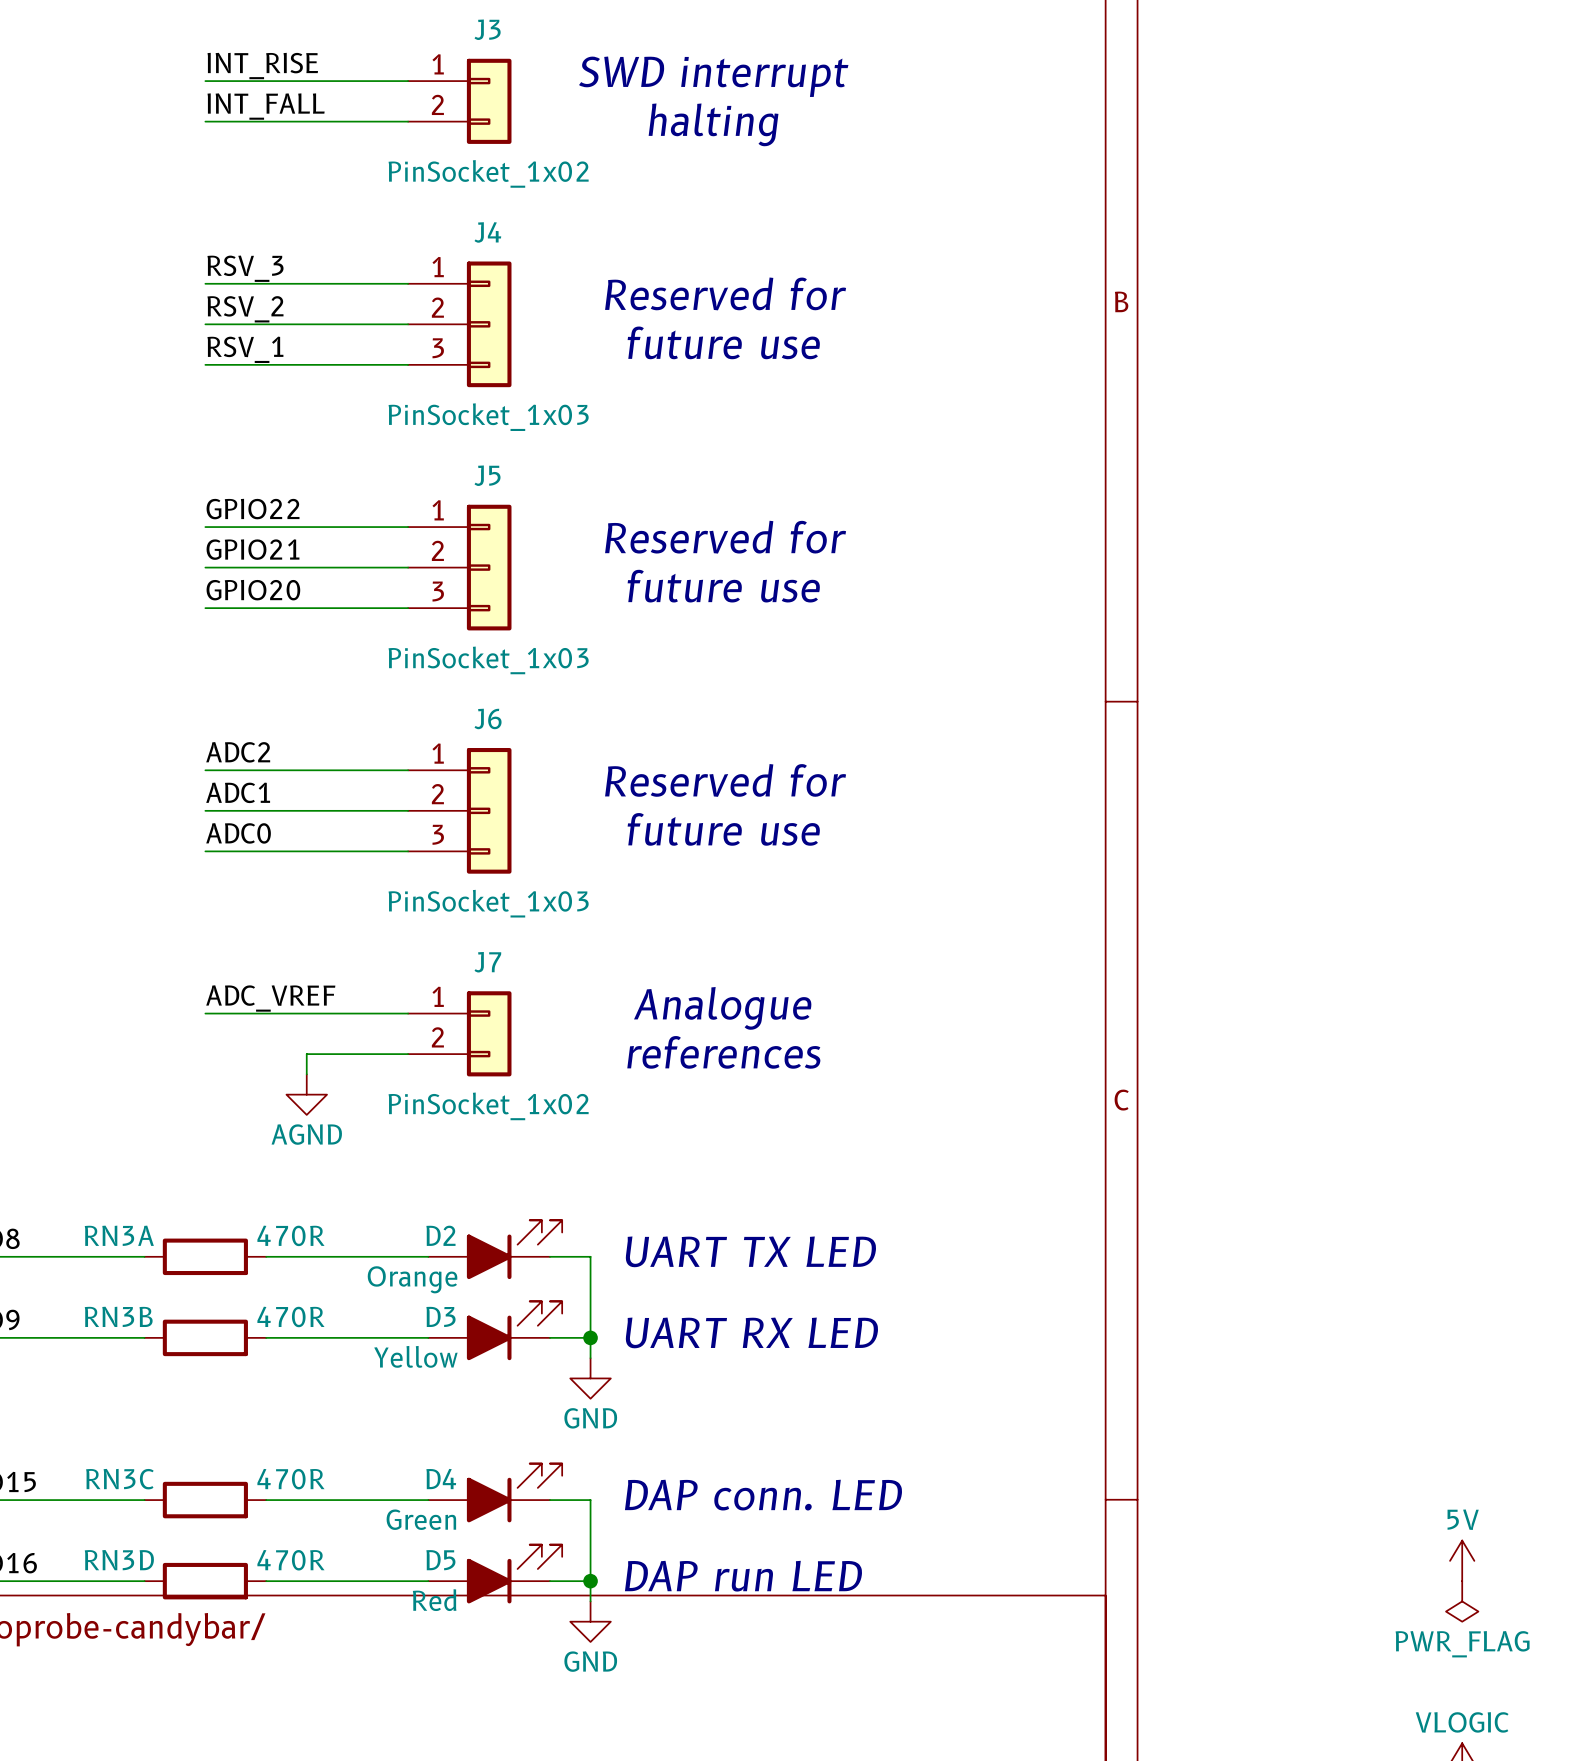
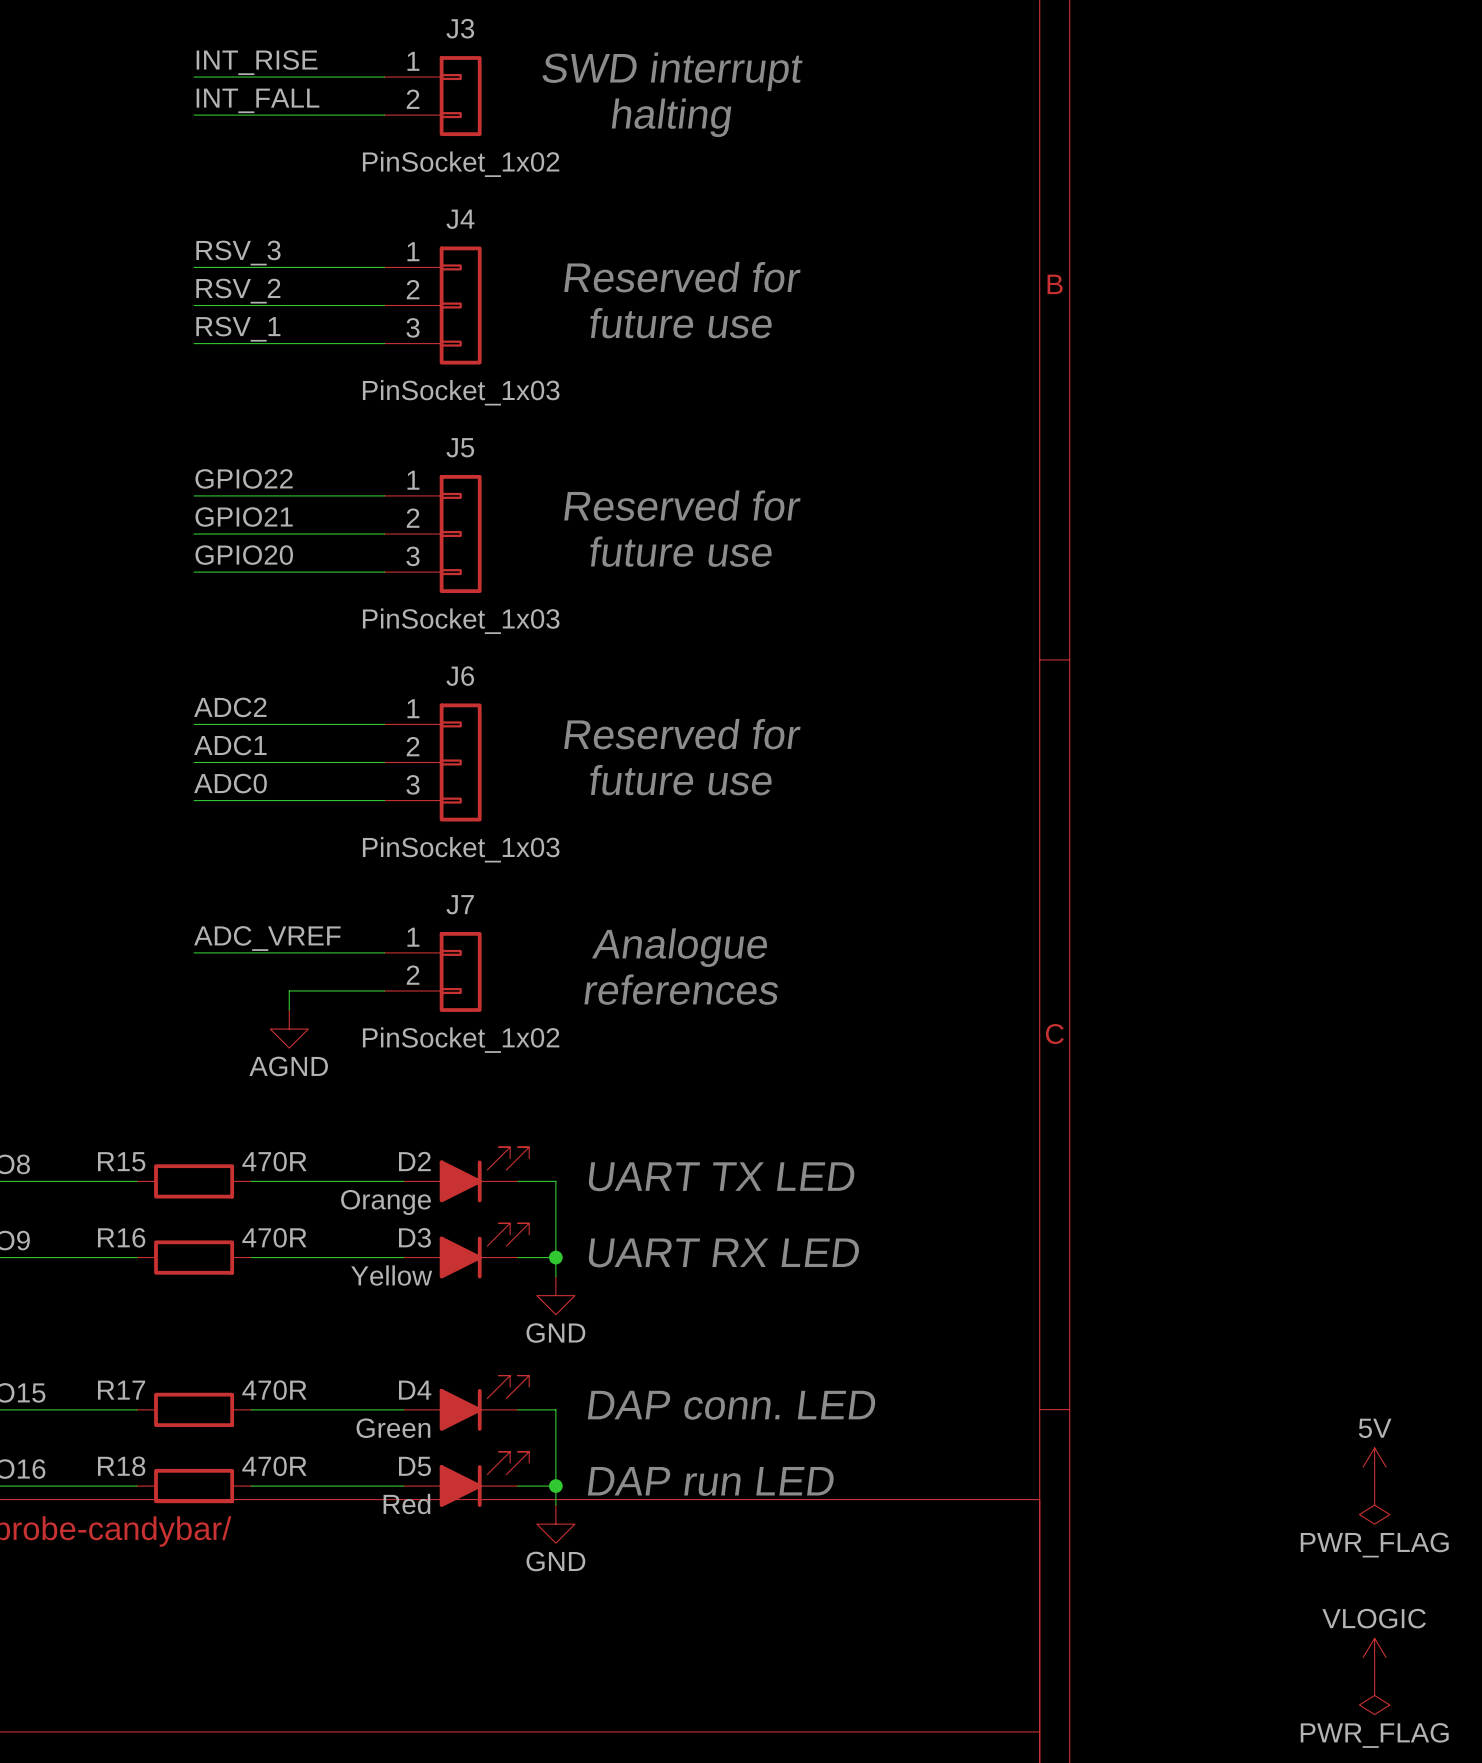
RN3A name: RN3A (119, 1235) -> R15 (121, 1161)
RN3B name: RN3B (118, 1316) -> R16 (121, 1237)
RN3C name: RN3C (119, 1479) -> R17 (121, 1390)
RN3D name: RN3D (119, 1560) -> R18 (121, 1466)

